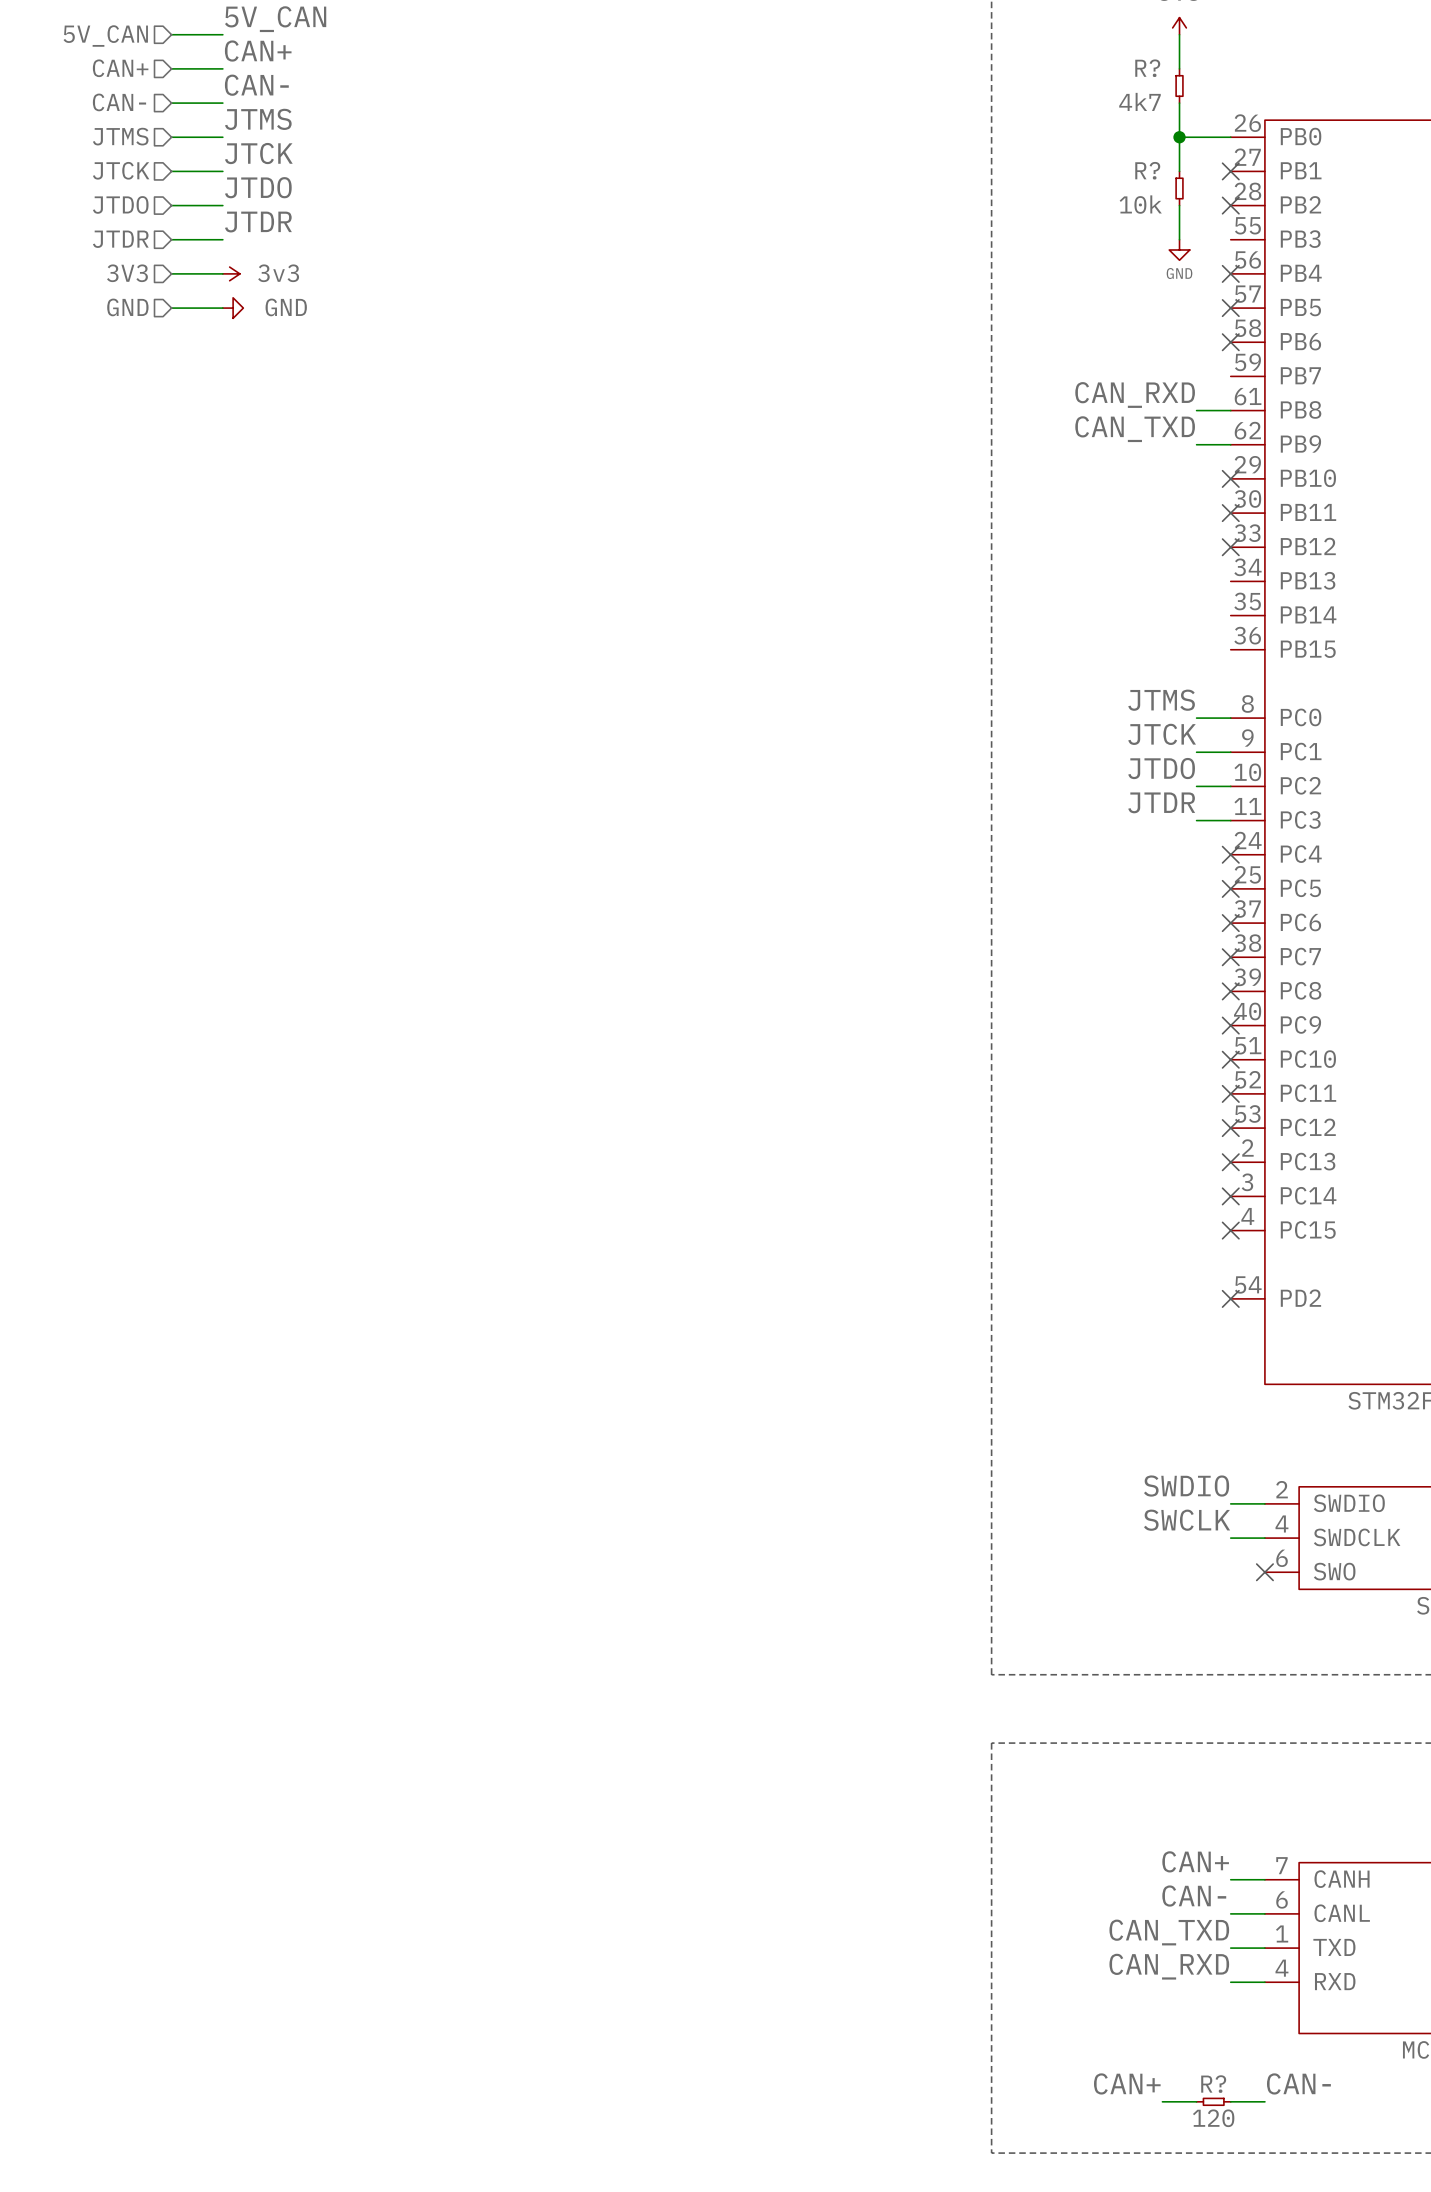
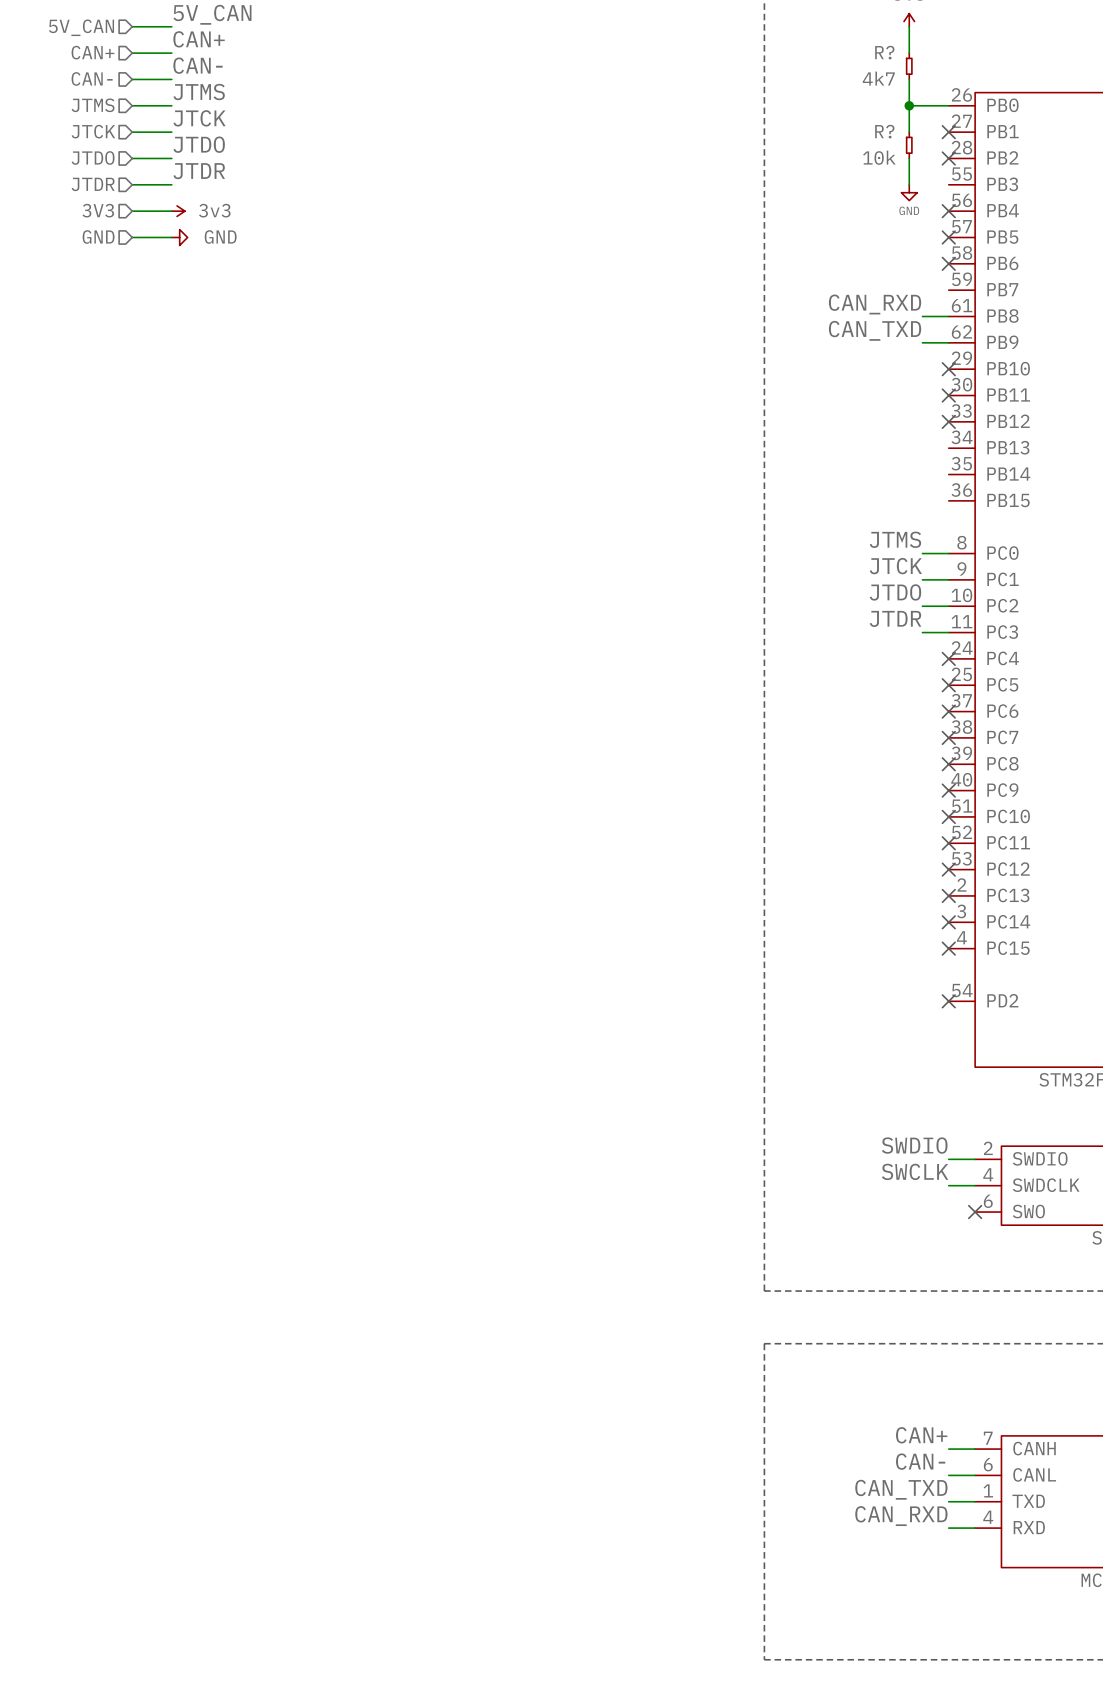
label: CAN+ (1127, 2083) -> none
label: CAN- (1298, 2083) -> none
wire: (1162, 2101) (1196, 2101) -> none
R?: 120 (1213, 2101) -> none
wire: (1230, 2101) (1264, 2101) -> none

